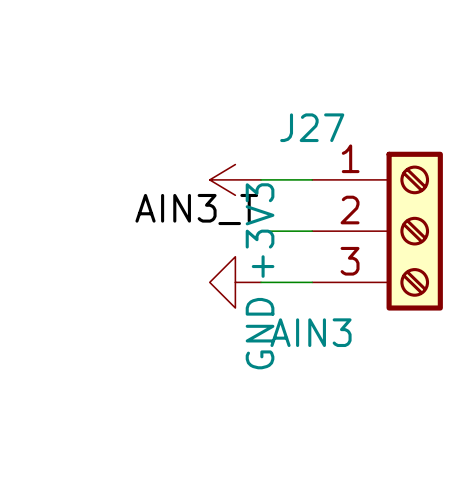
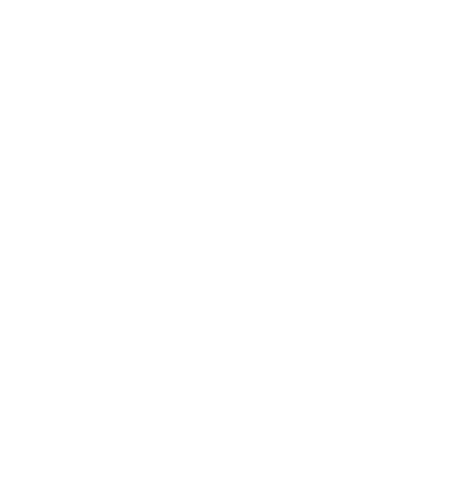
power symbol: +3V3 (235, 179) -> none
wire: (261, 179) (312, 179) -> none
label: AIN3_T (196, 209) -> none
wire: (261, 231) (312, 231) -> none
J27: AIN3 (377, 231) -> none
power symbol: GND (235, 282) -> none
wire: (261, 282) (312, 282) -> none

